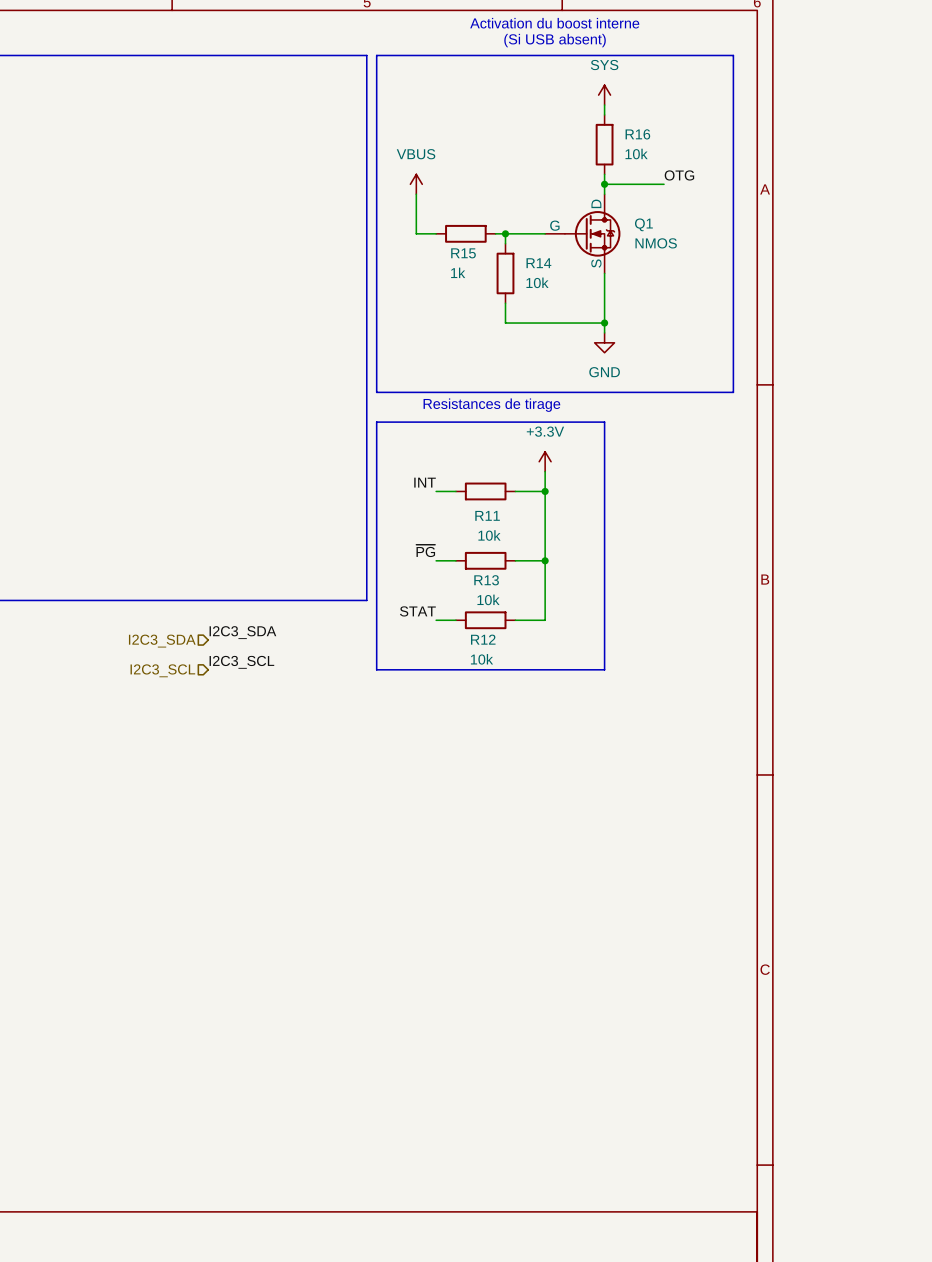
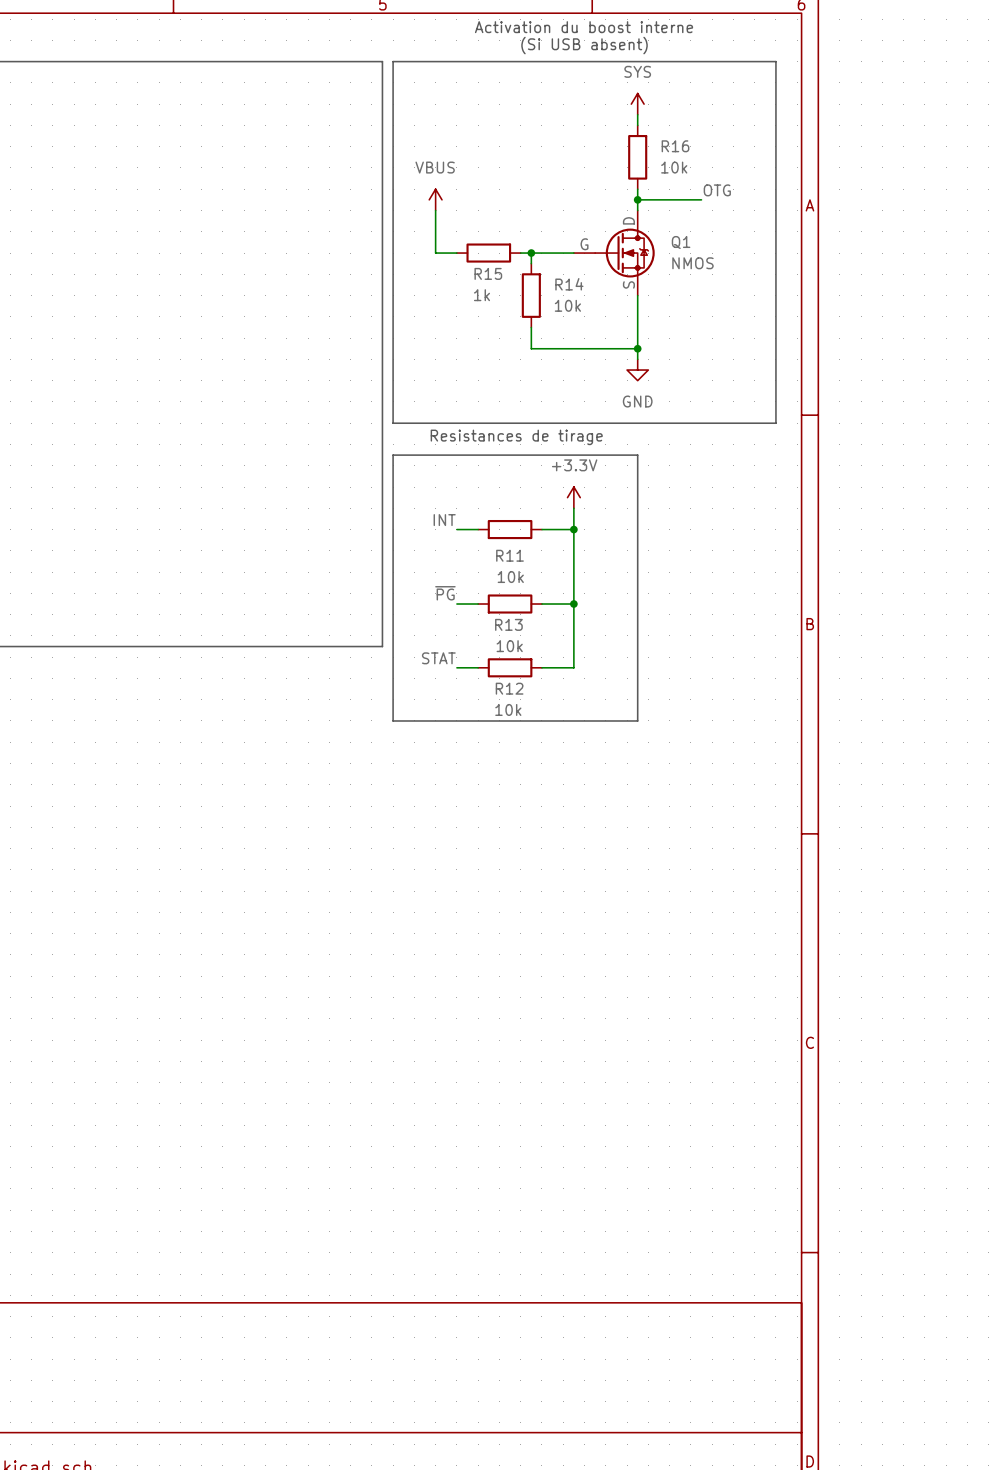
label: I2C3_SDA (242, 632) -> none
hierarchical label: I2C3_SDA (162, 641) -> none
label: I2C3_SCL (241, 662) -> none
hierarchical label: I2C3_SCL (162, 670) -> none

